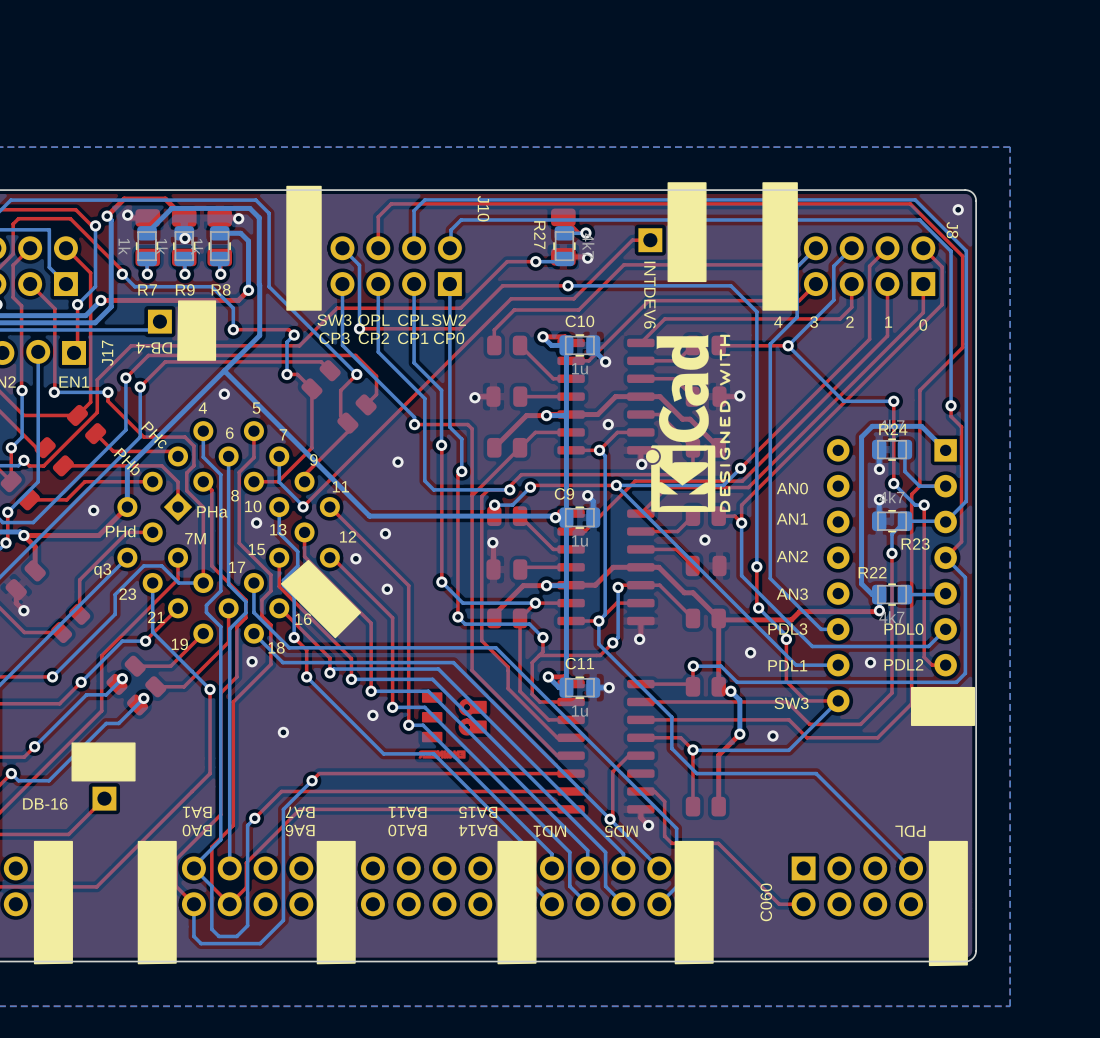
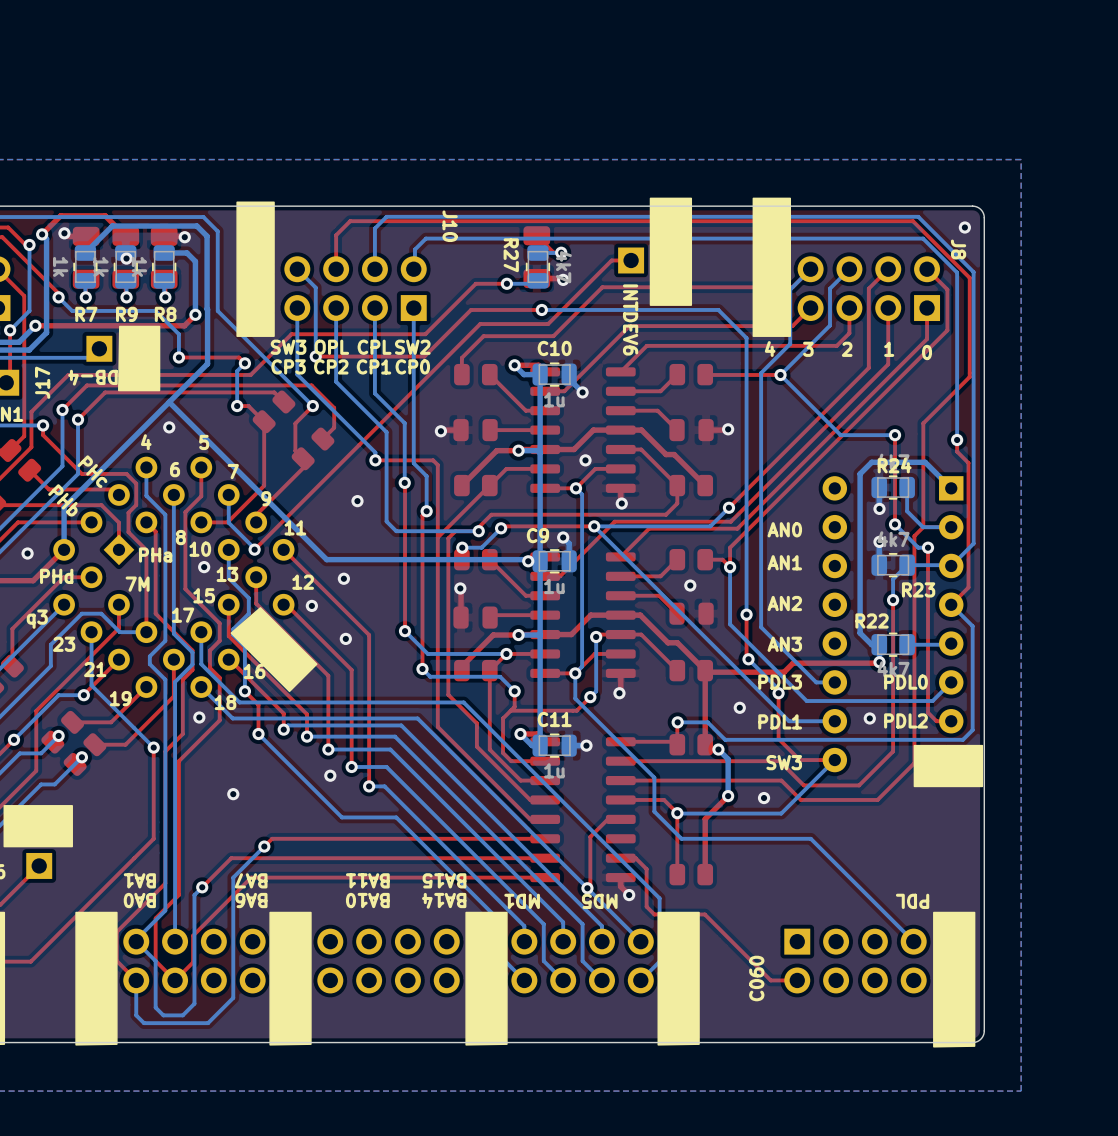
drawing: [645, 334, 731, 513] -> none
drawing: [418, 692, 487, 759] -> none

